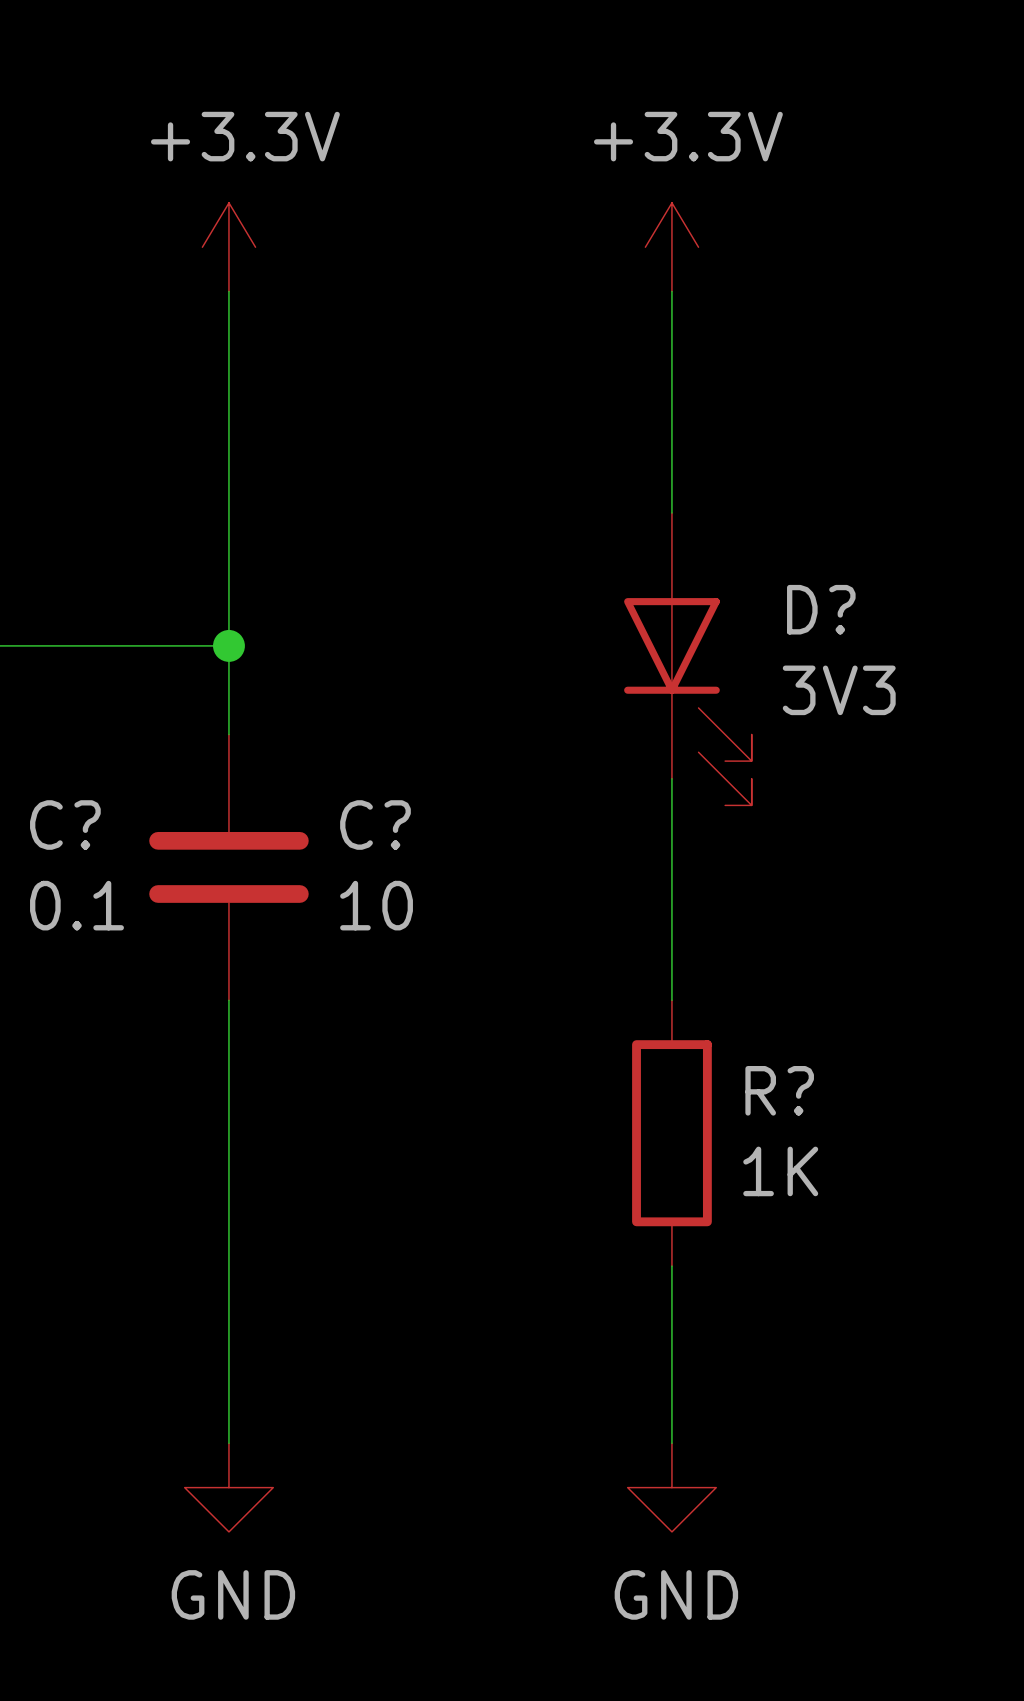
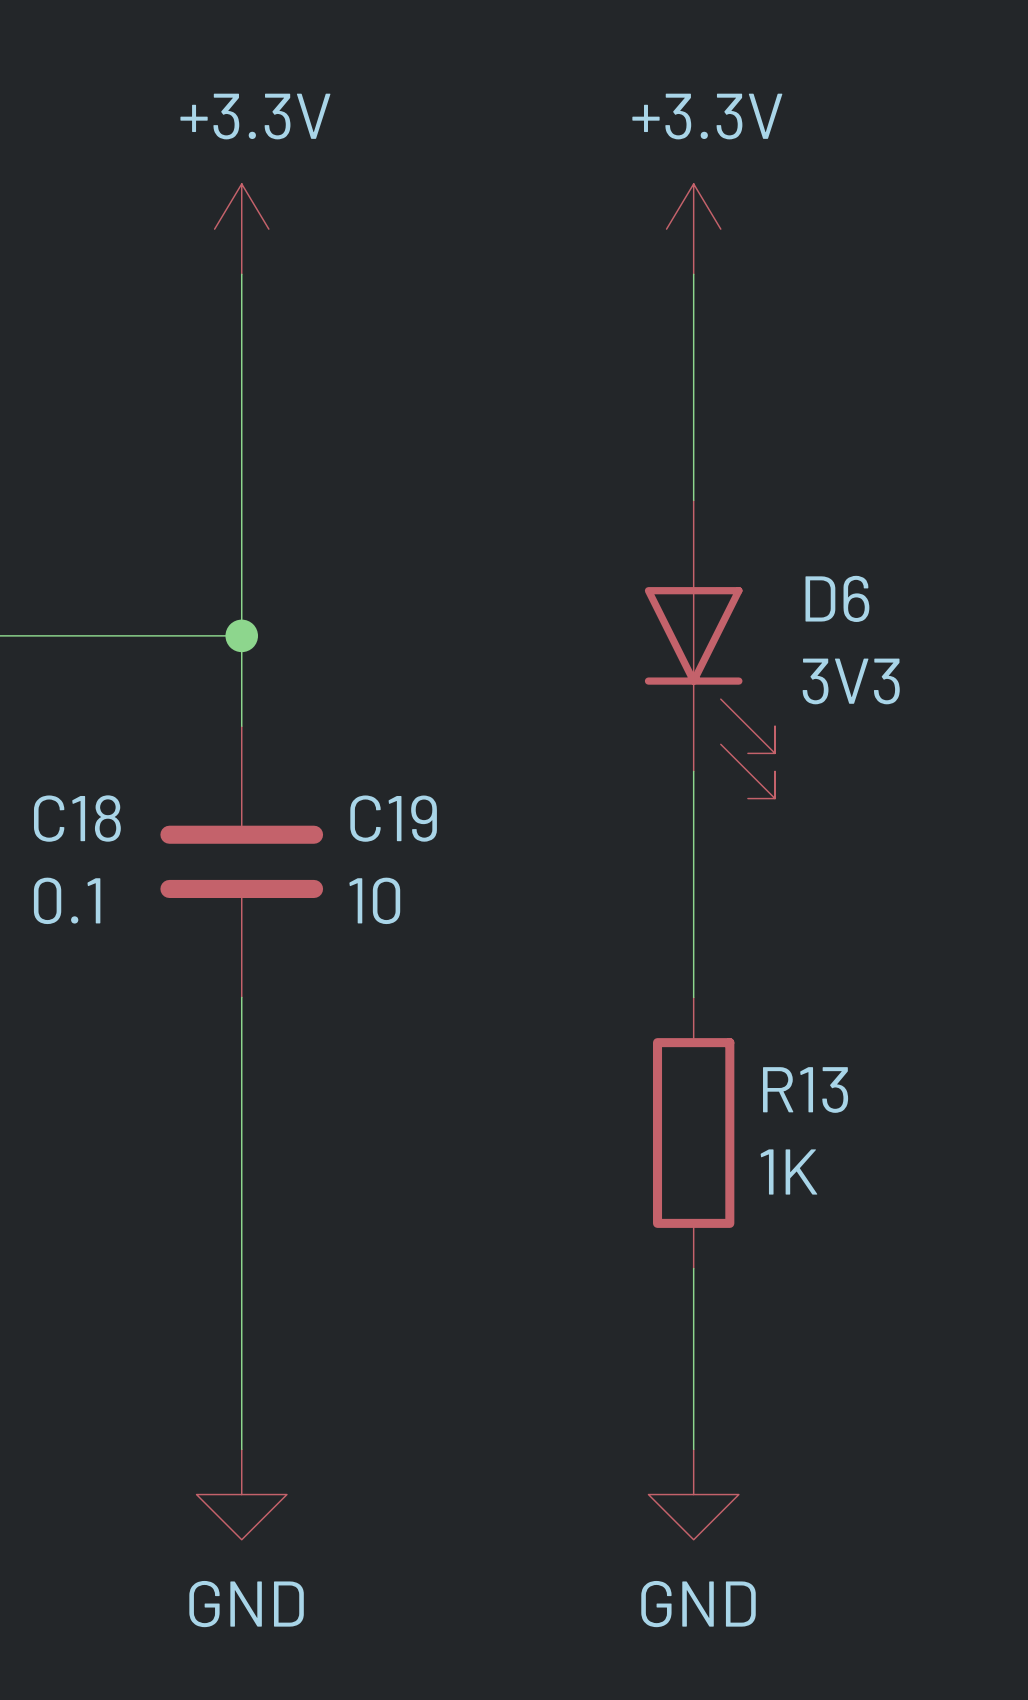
D? name: D? (821, 609) -> D6 (837, 598)
C? name: C? (65, 825) -> C18 (77, 818)
C? name: C? (375, 825) -> C19 (393, 818)
R? name: R? (779, 1090) -> R13 (805, 1089)

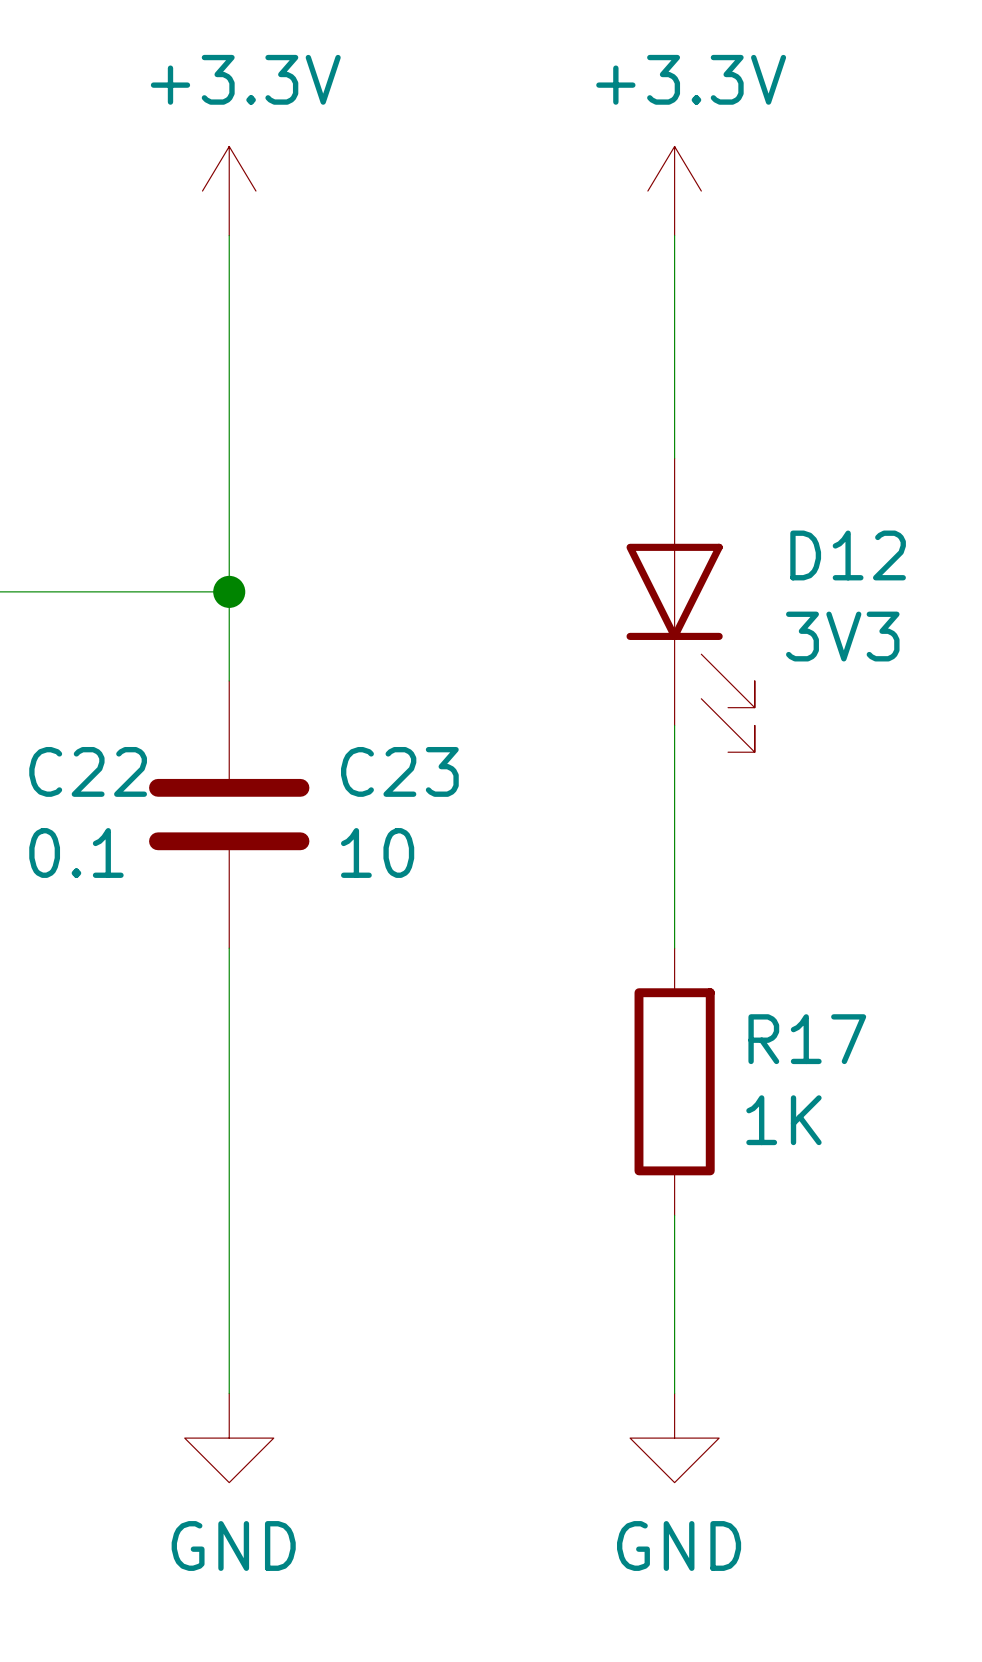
D6 name: D6 (837, 598) -> D12 (848, 555)
C18 name: C18 (77, 818) -> C22 (88, 771)
C19 name: C19 (393, 818) -> C23 (399, 771)
R13 name: R13 (805, 1089) -> R17 (807, 1039)

